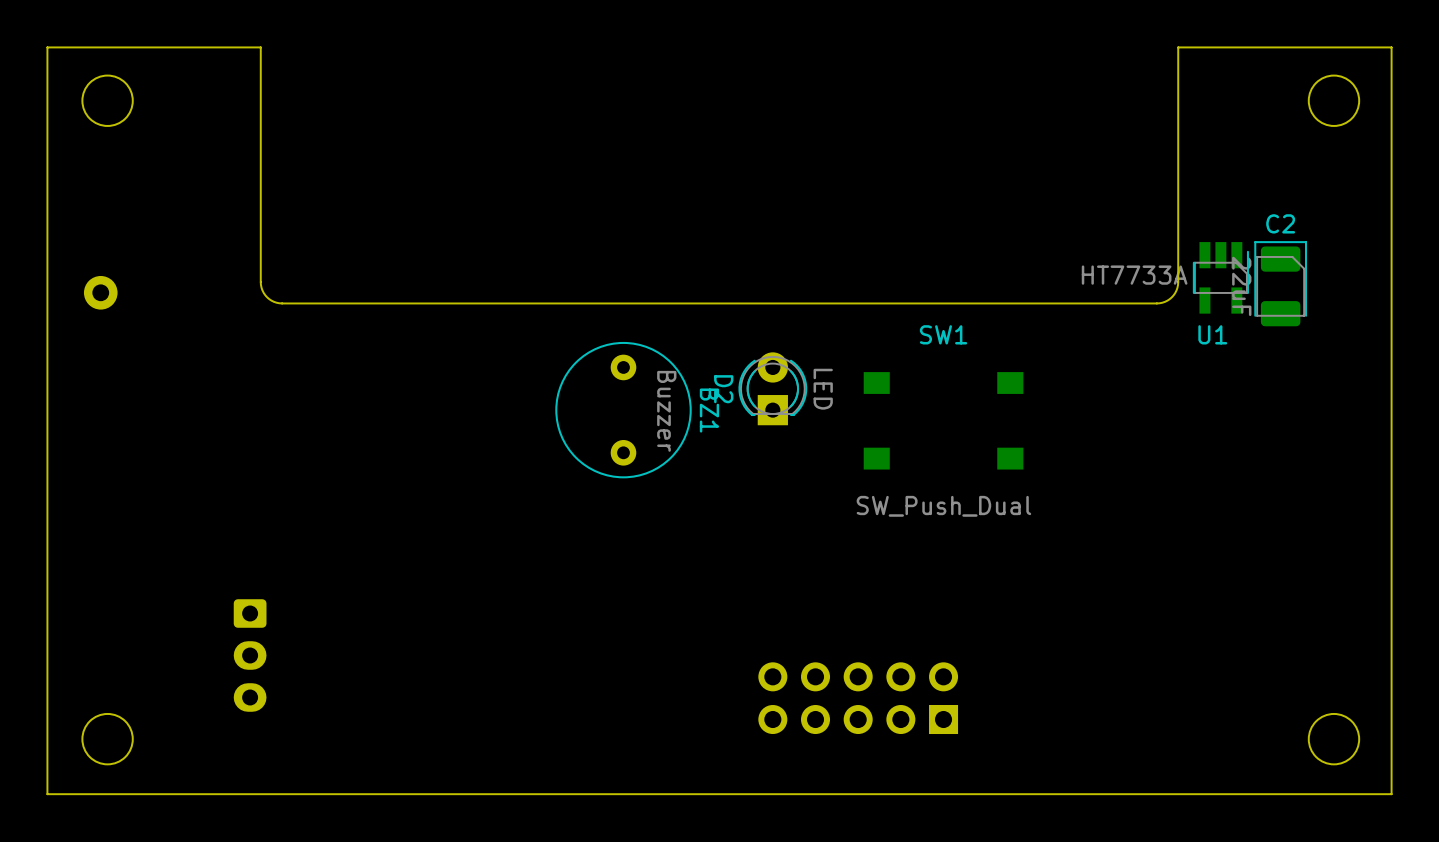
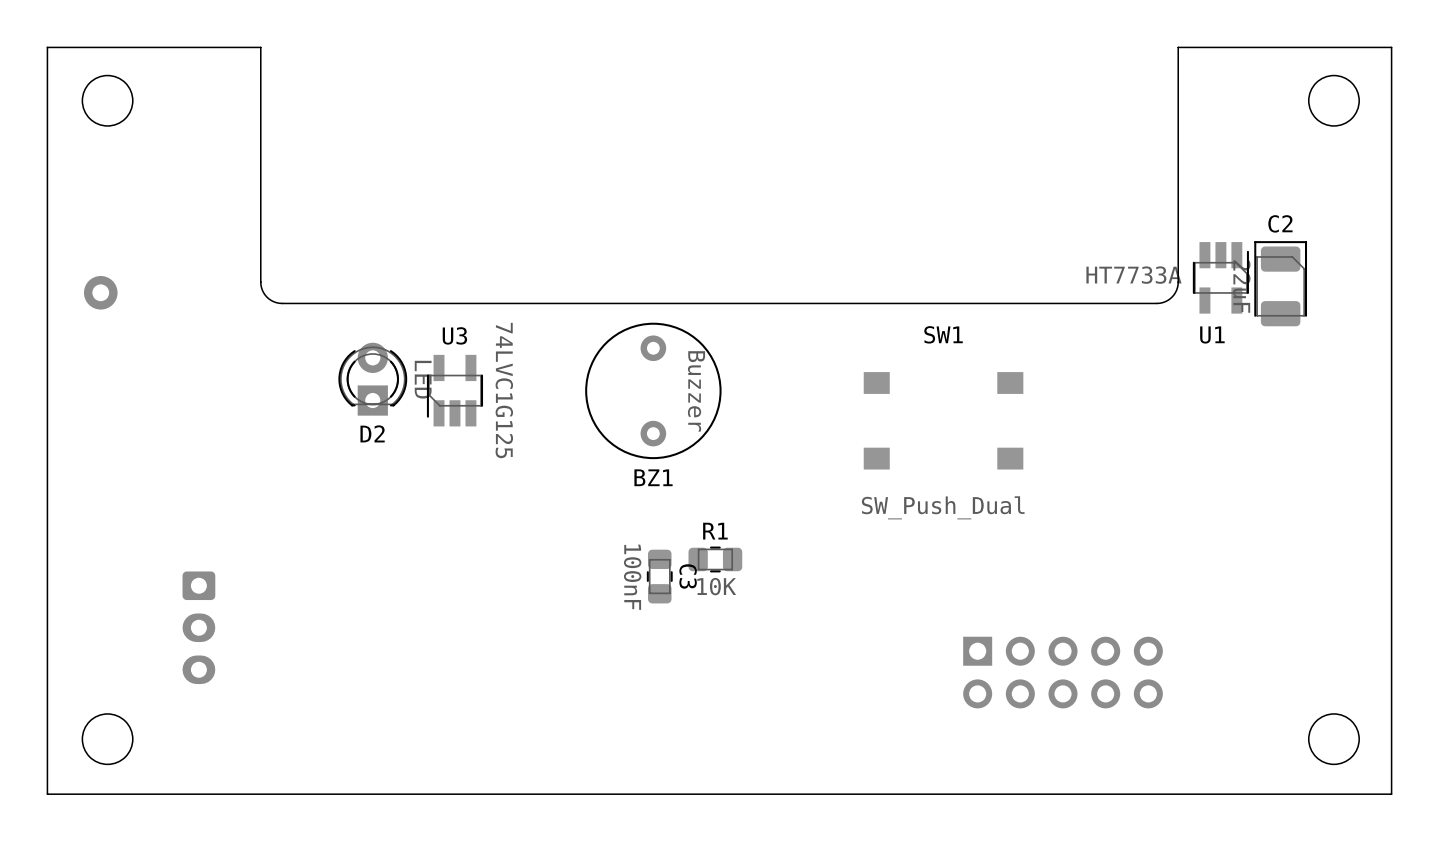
D2 position: (772, 388) -> (372, 379)
D2 name rotation: 0° (723, 389) -> 90° counterclockwise (372, 433)
D2 name position: D2 (723, 389) -> D2 (372, 433)
U3: none -> 74LVC1G125 (454, 390)
BZ1 position: (623, 410) -> (653, 390)
BZ1 name rotation: 0° (709, 410) -> 90° counterclockwise (653, 477)
BZ1 name position: BZ1 (709, 410) -> BZ1 (653, 477)
R1: none -> 10K (715, 559)
C3: none -> 100nF (659, 576)
part position: (250, 655) -> (198, 627)
part rotation: 0° (858, 698) -> 180° (1063, 672)
part position: (858, 698) -> (1063, 672)

